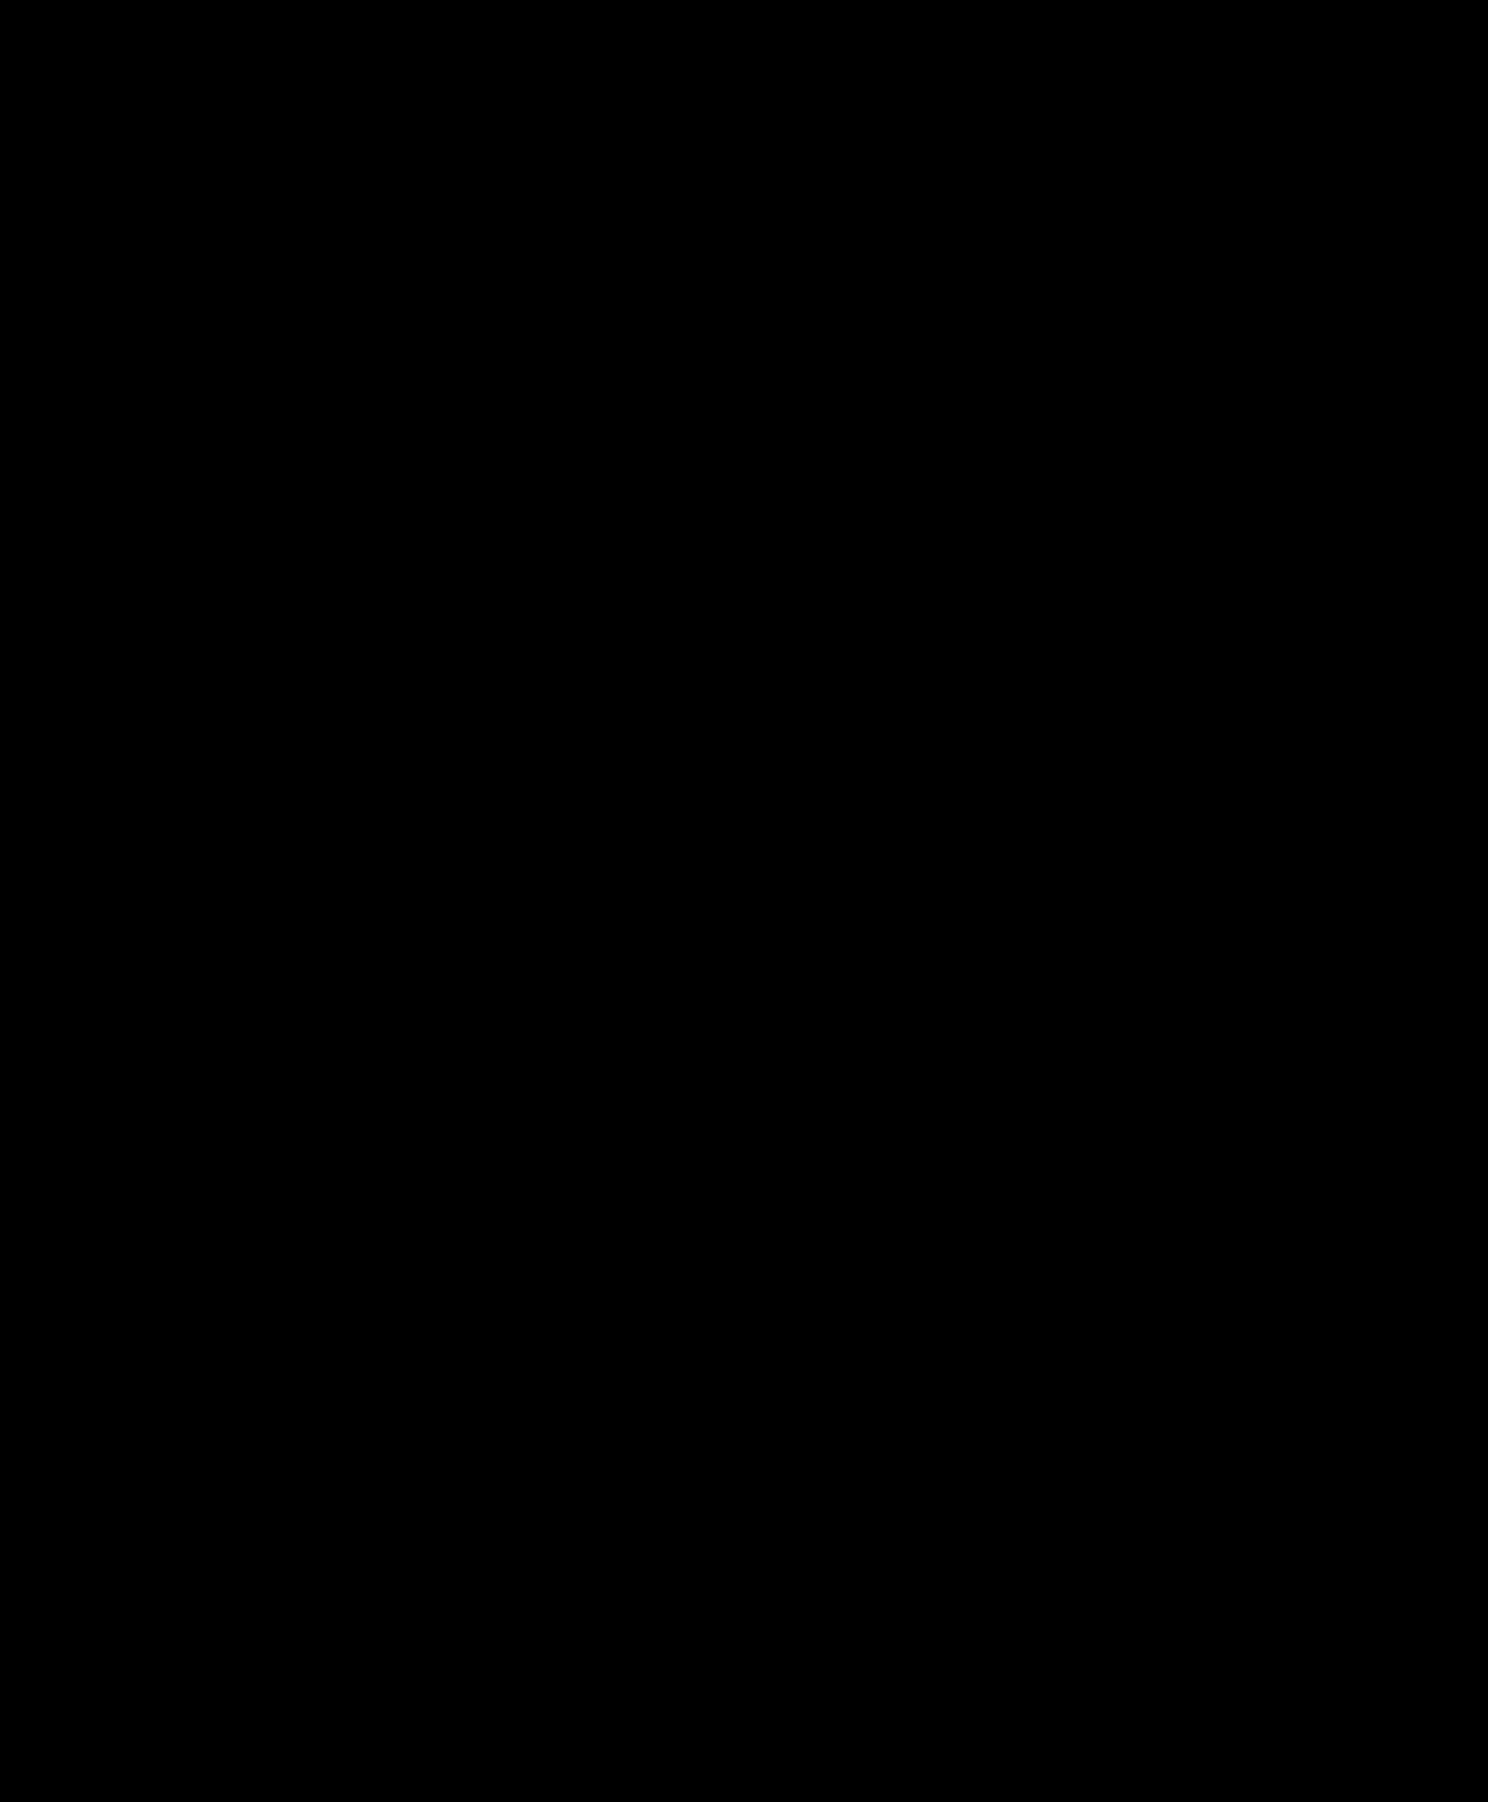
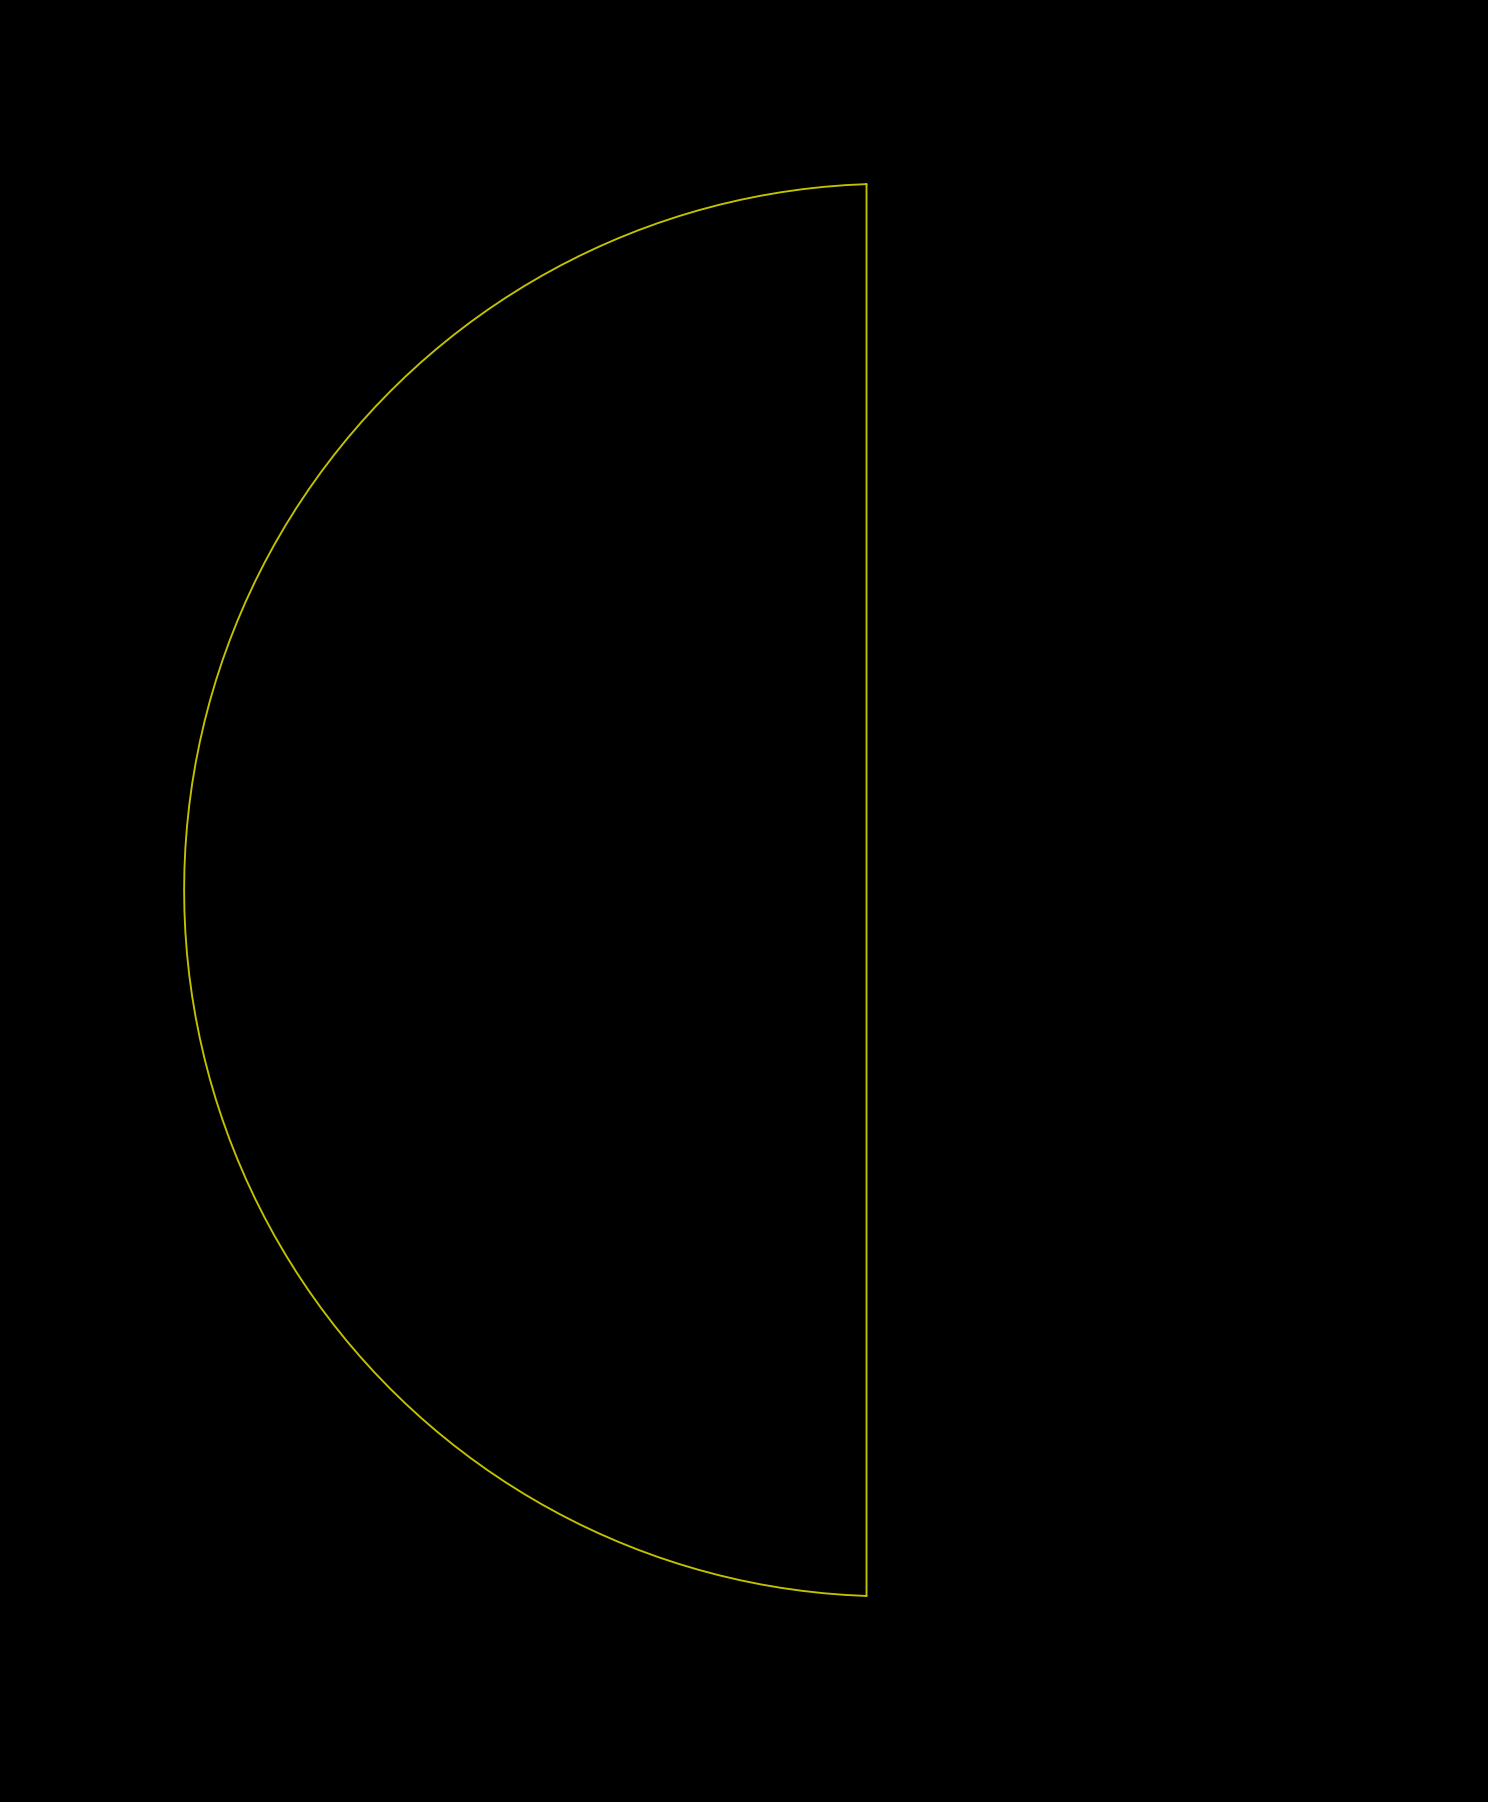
board edge: none -> (866, 184) (866, 1595) (781, 1587) (719, 1575) (658, 1557) (598, 1533) (541, 1504) (470, 1458) (420, 1417) (375, 1373) (320, 1307) (285, 1254) (255, 1198) (229, 1139) (209, 1079) (195, 1017) (186, 953) (184, 890) (186, 826) (195, 763) (209, 700) (229, 640) (255, 581) (296, 507) (333, 455) (375, 406) (420, 362) (470, 322) (523, 286) (598, 246) (678, 216) (739, 199) (802, 189) (845, 185) (866, 184)

